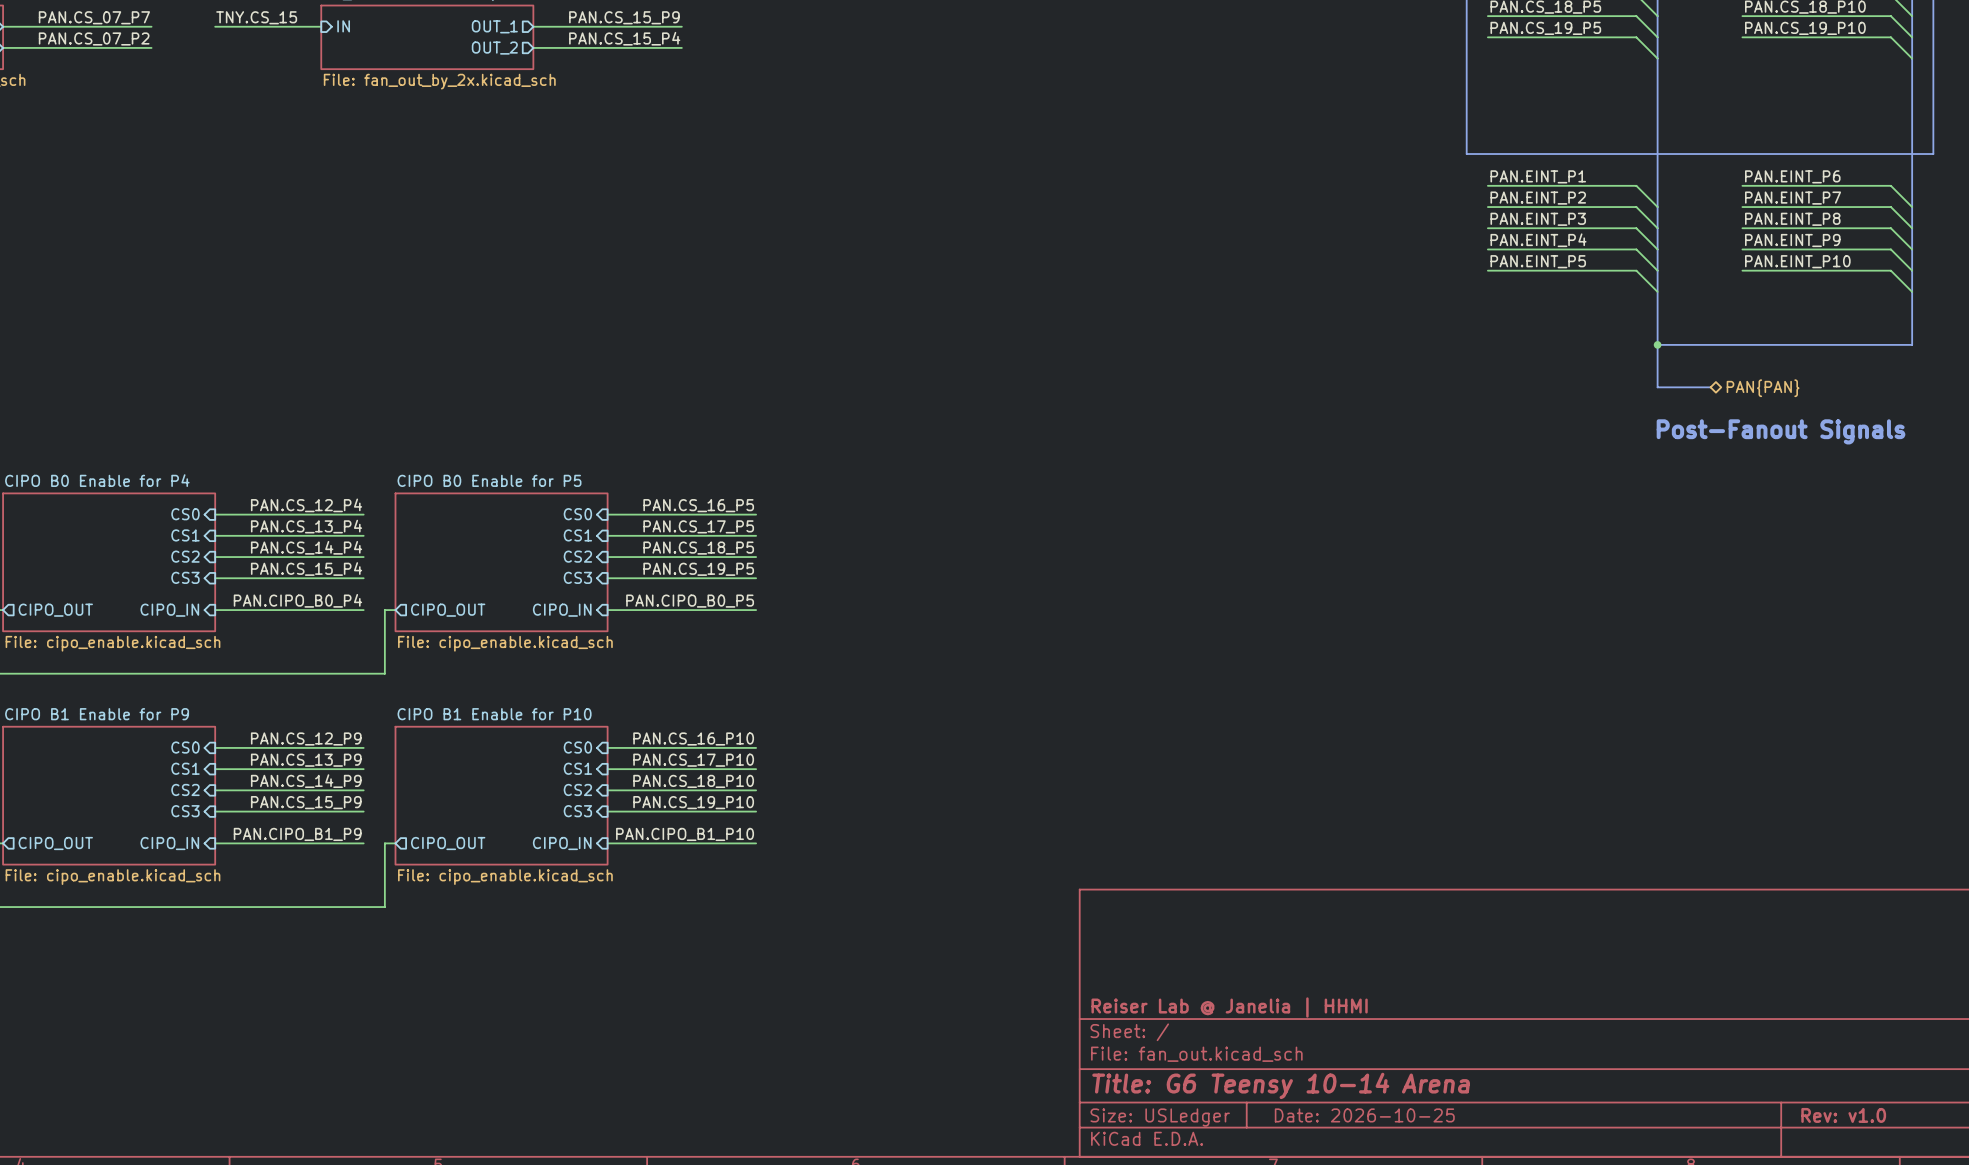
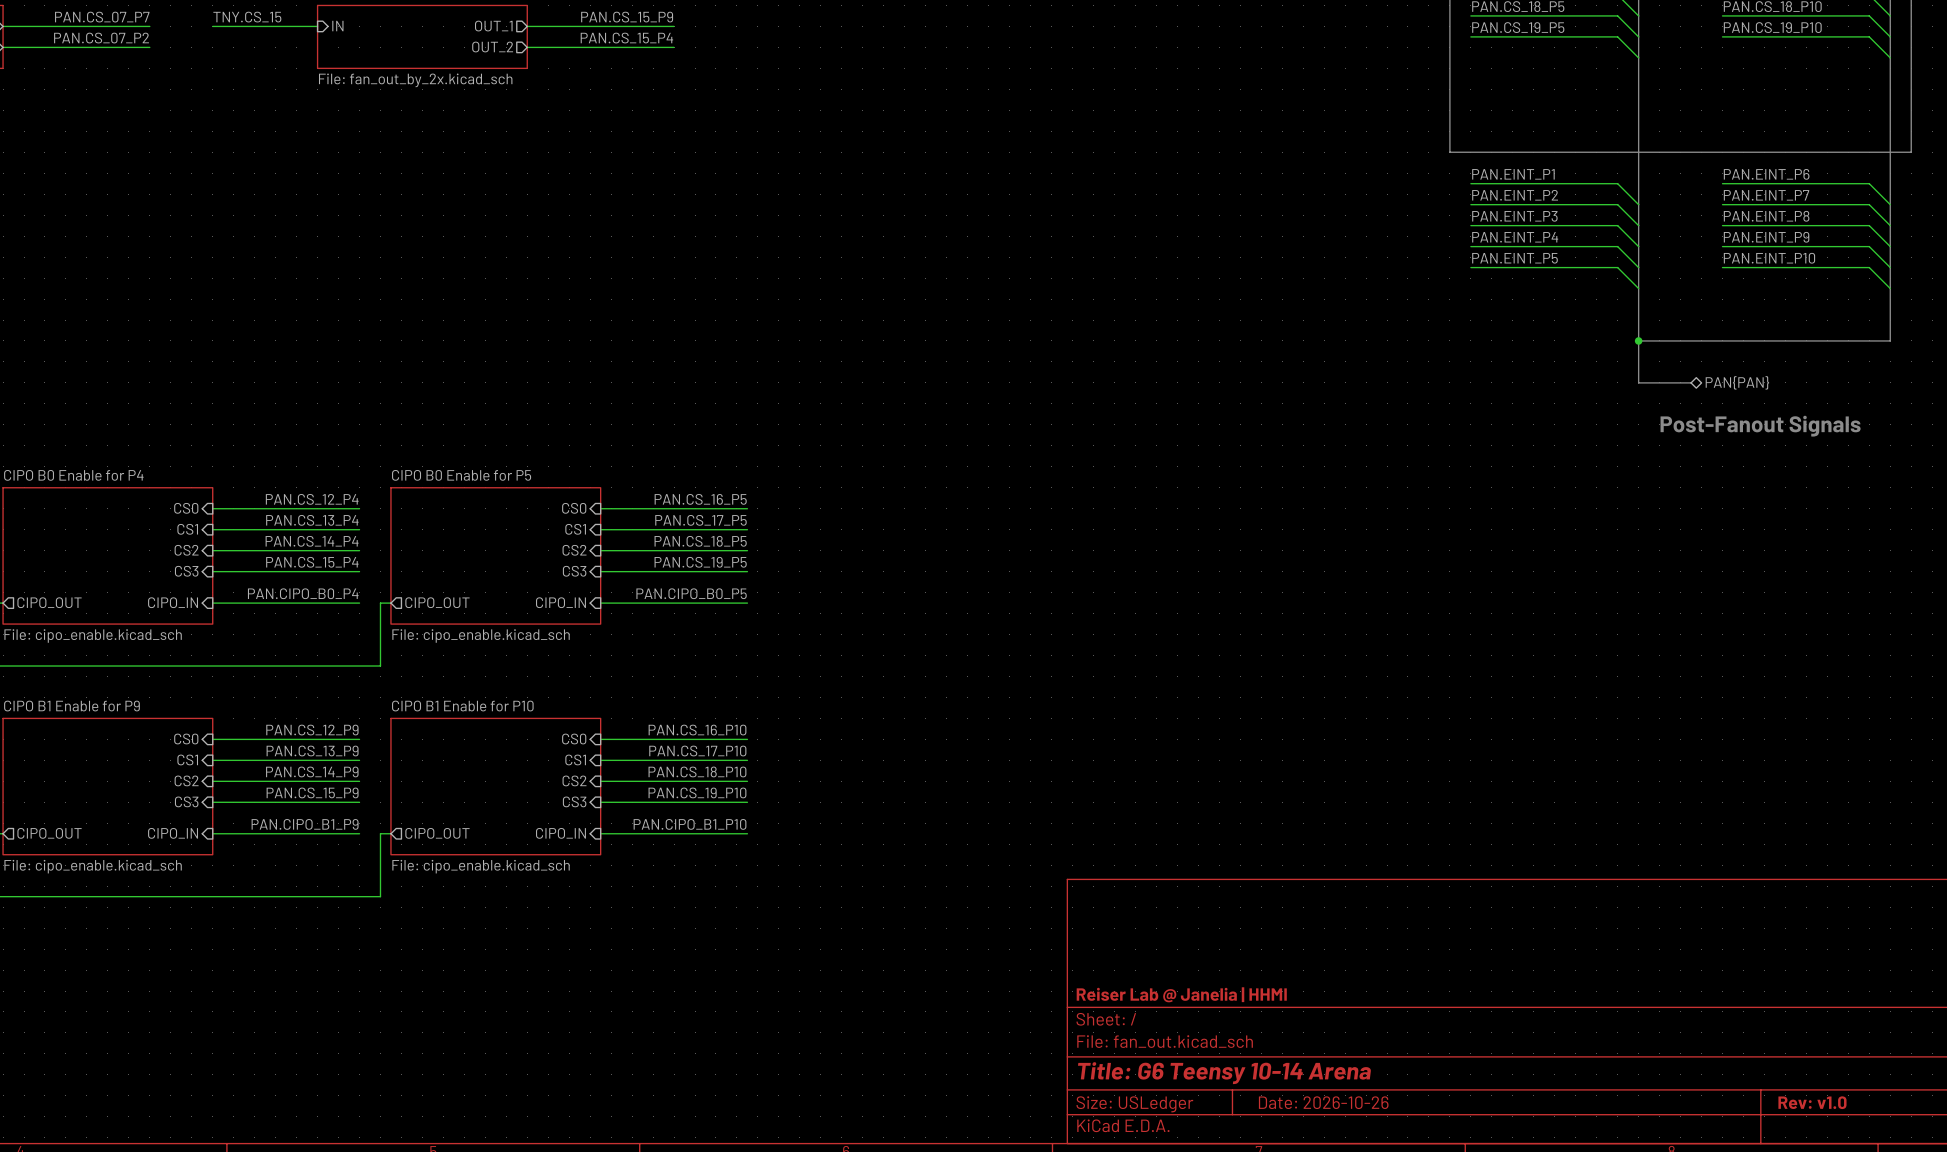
title block: Date: 2026-10-25 (1364, 1115) -> Date: 2026-10-26 (1323, 1102)

